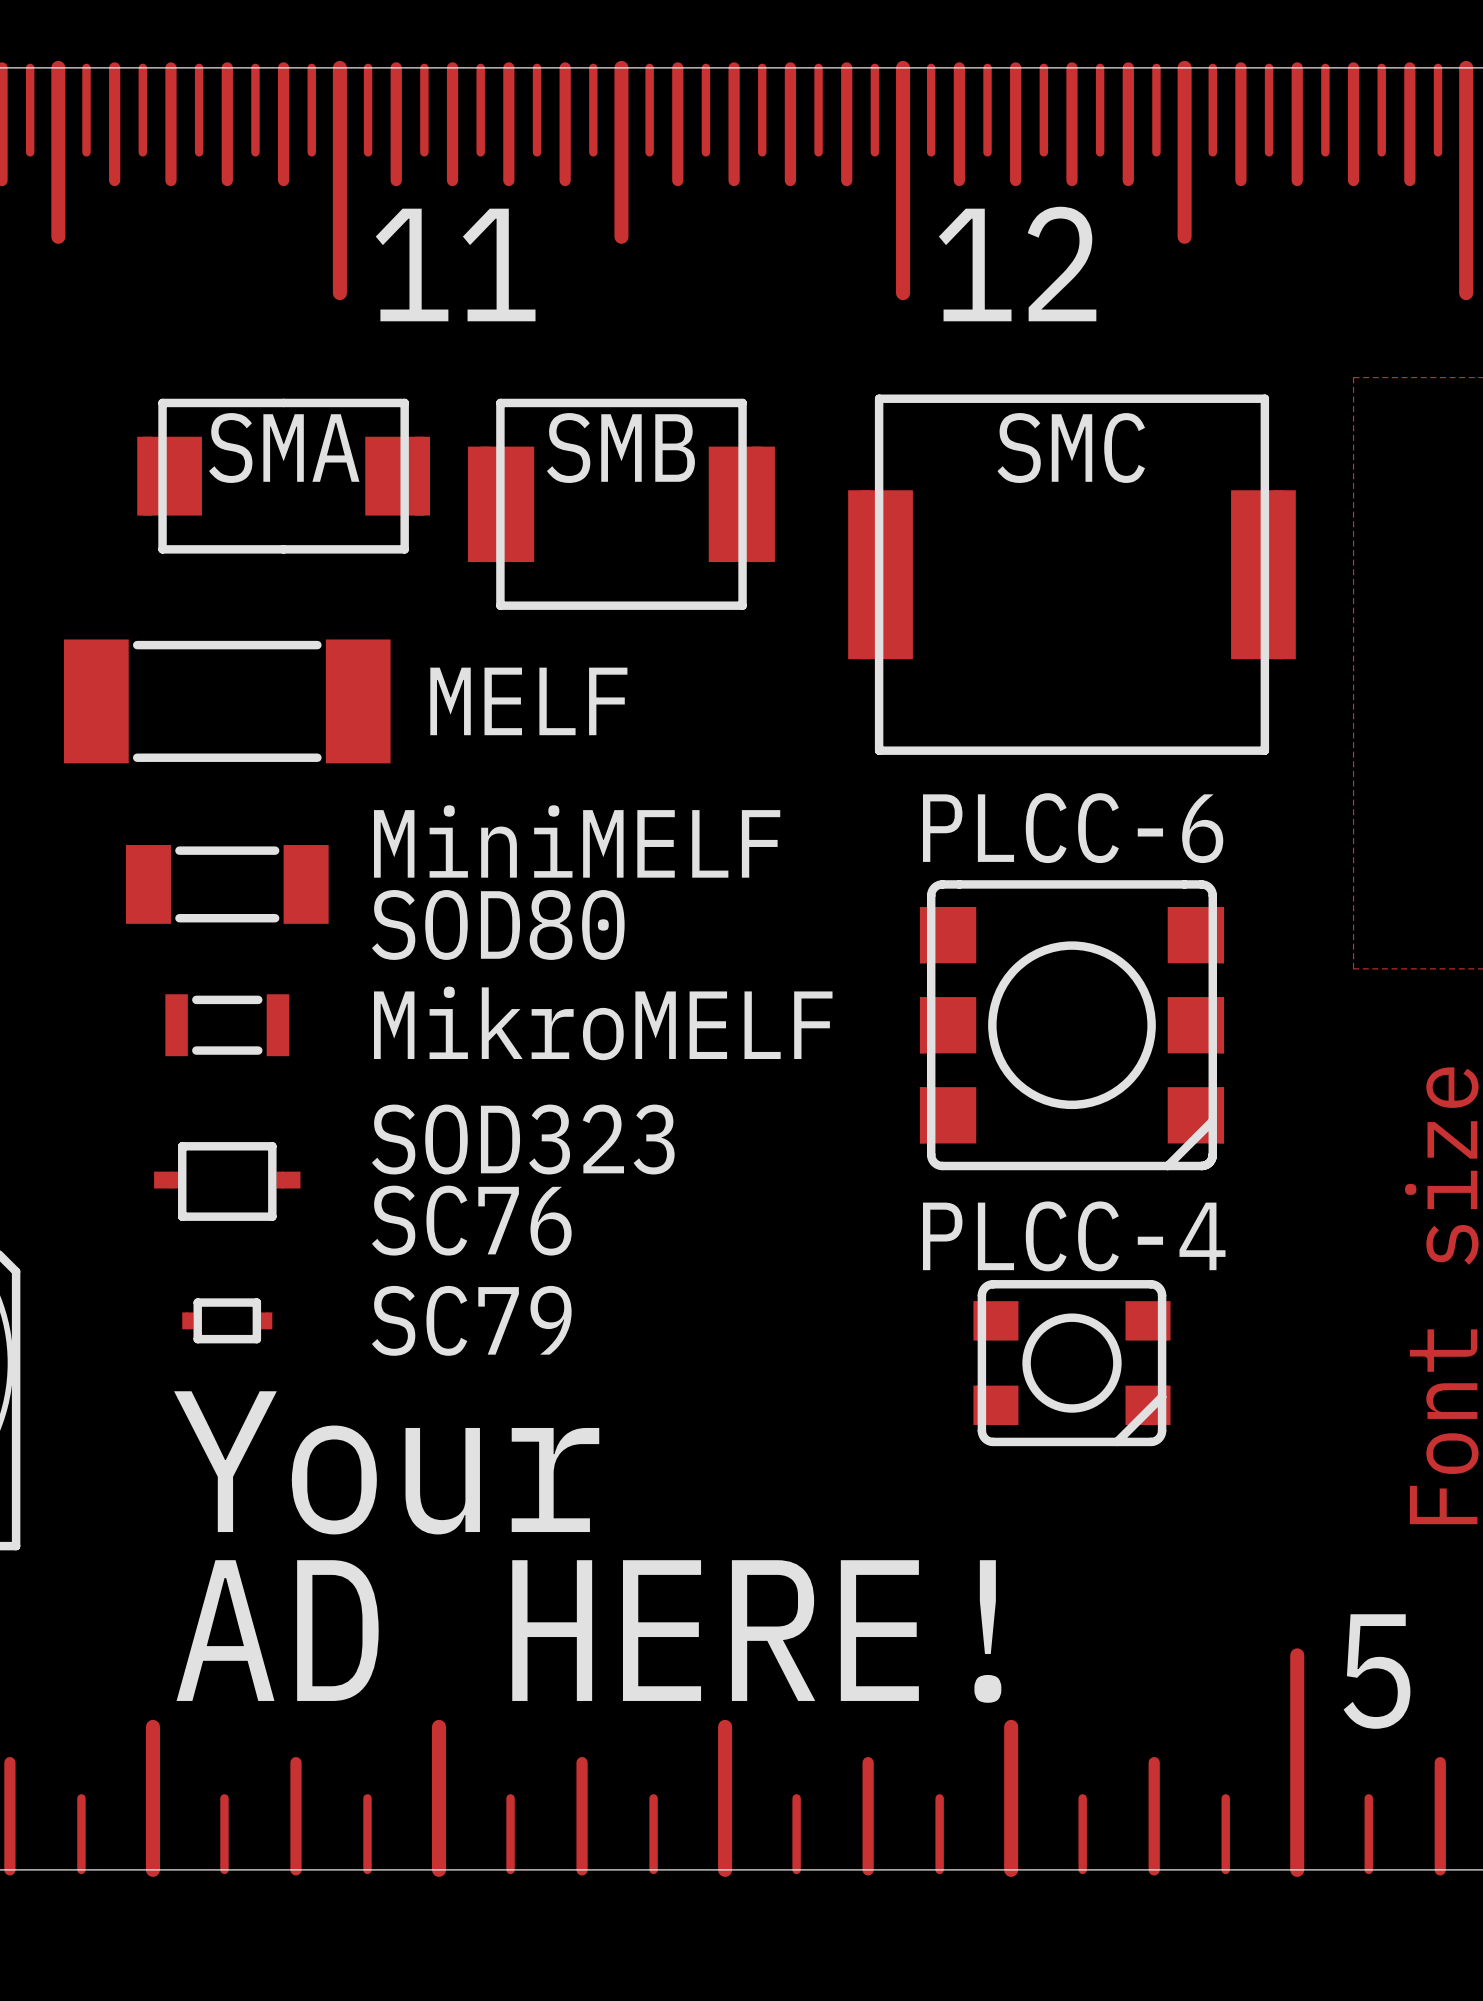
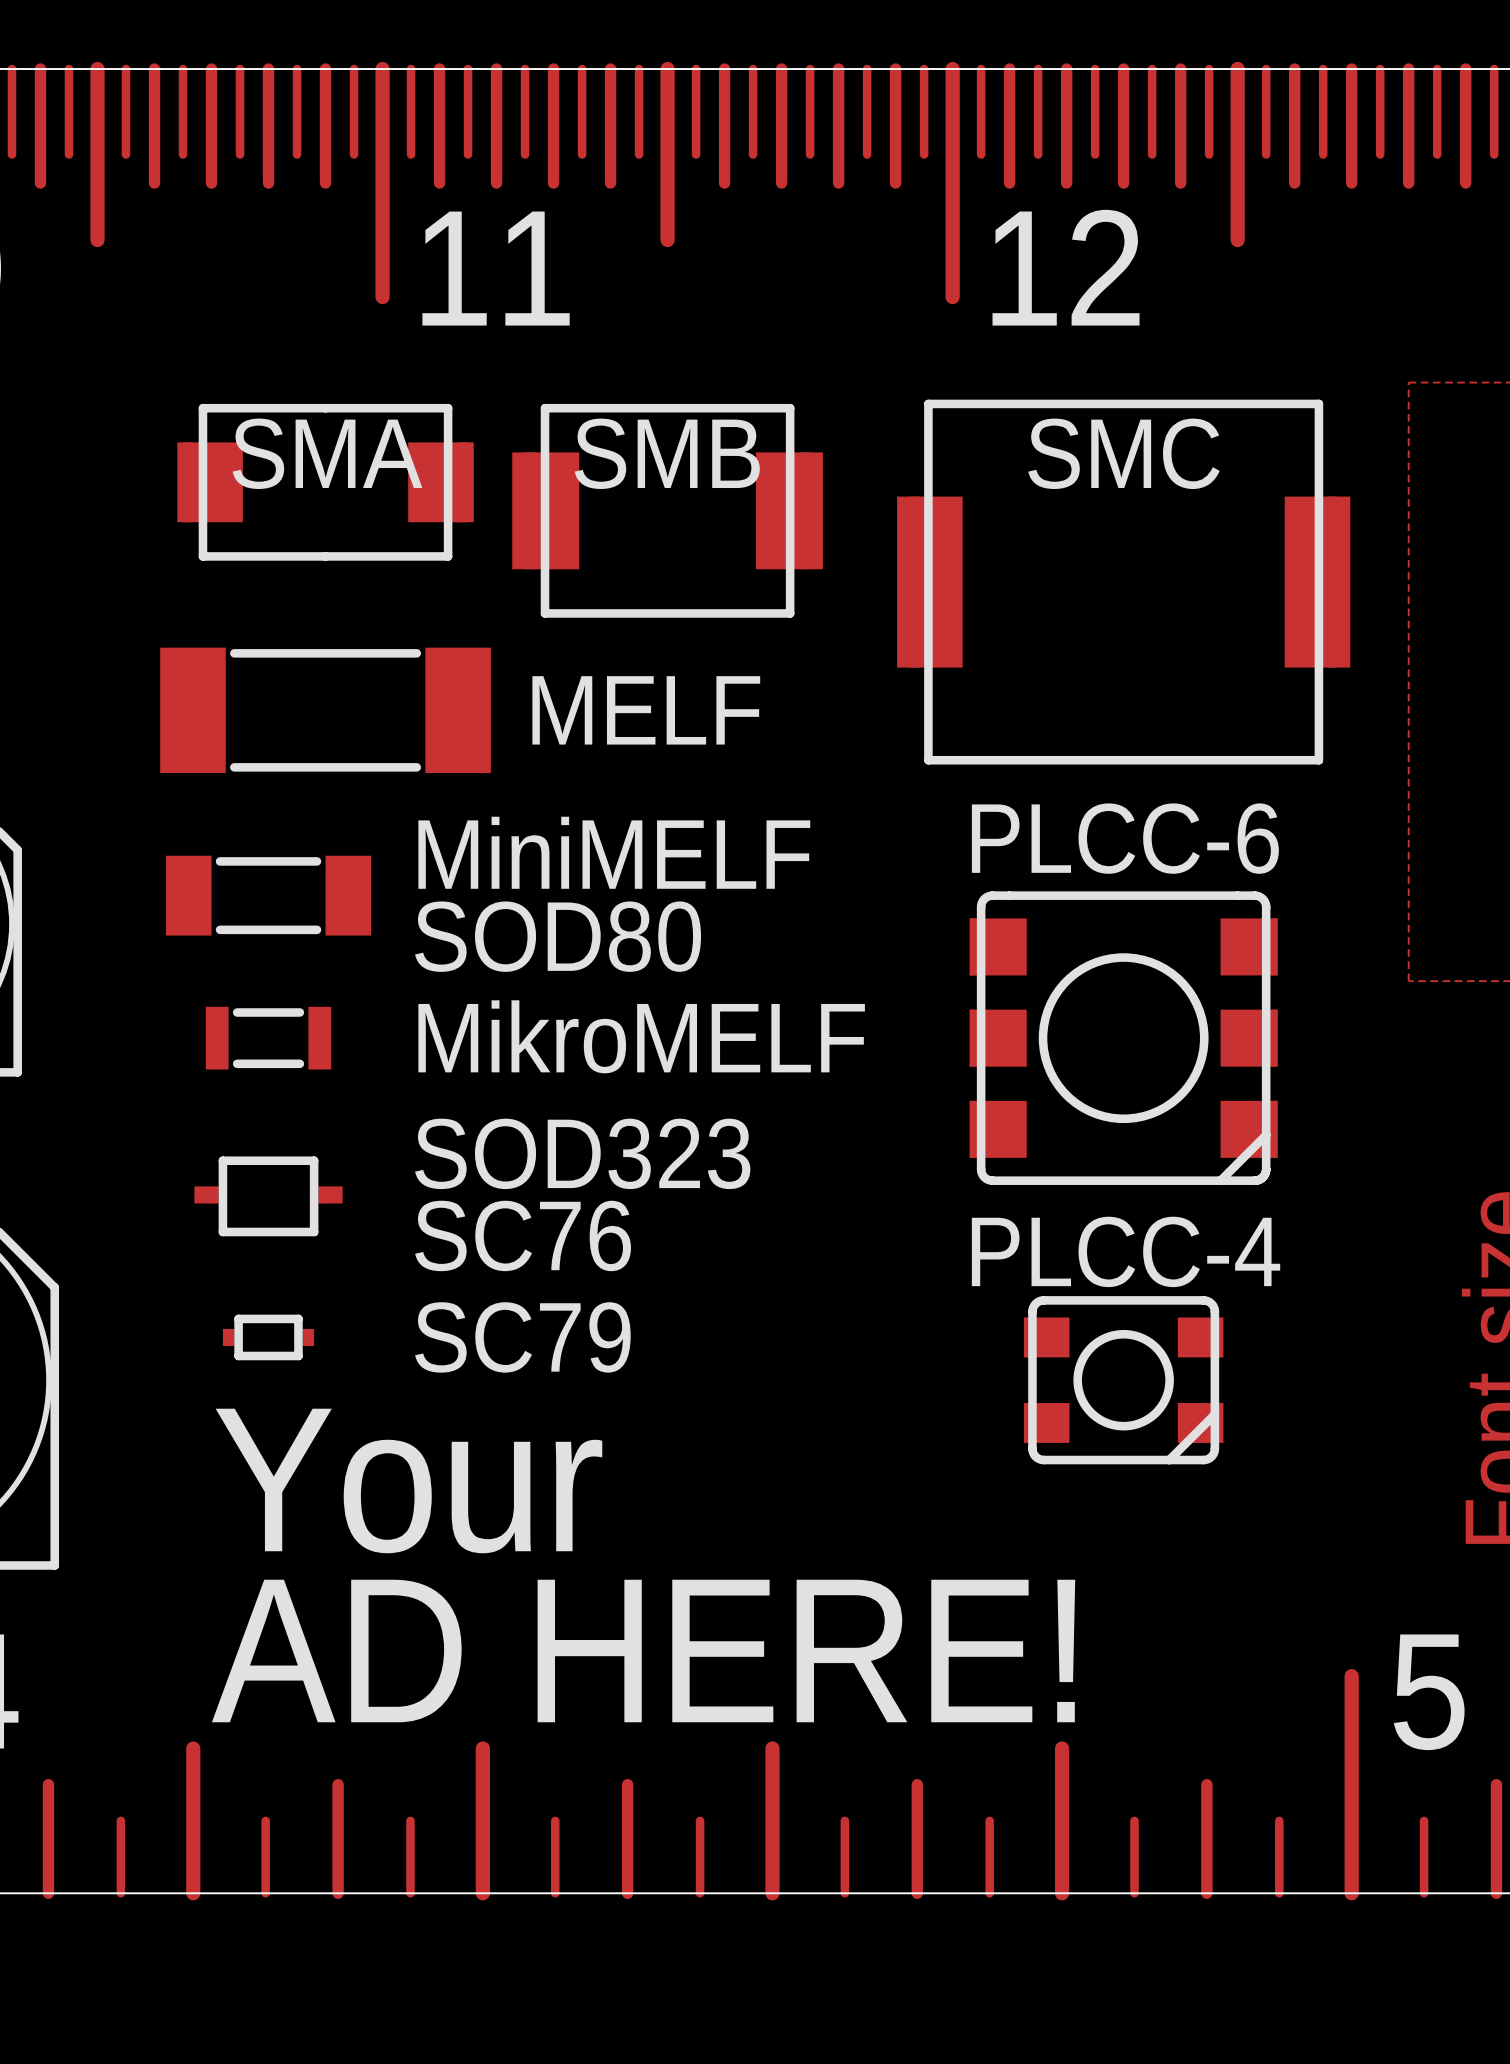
part position: (227, 701) -> (325, 710)
text position: MELF (528, 701) -> MELF (646, 710)

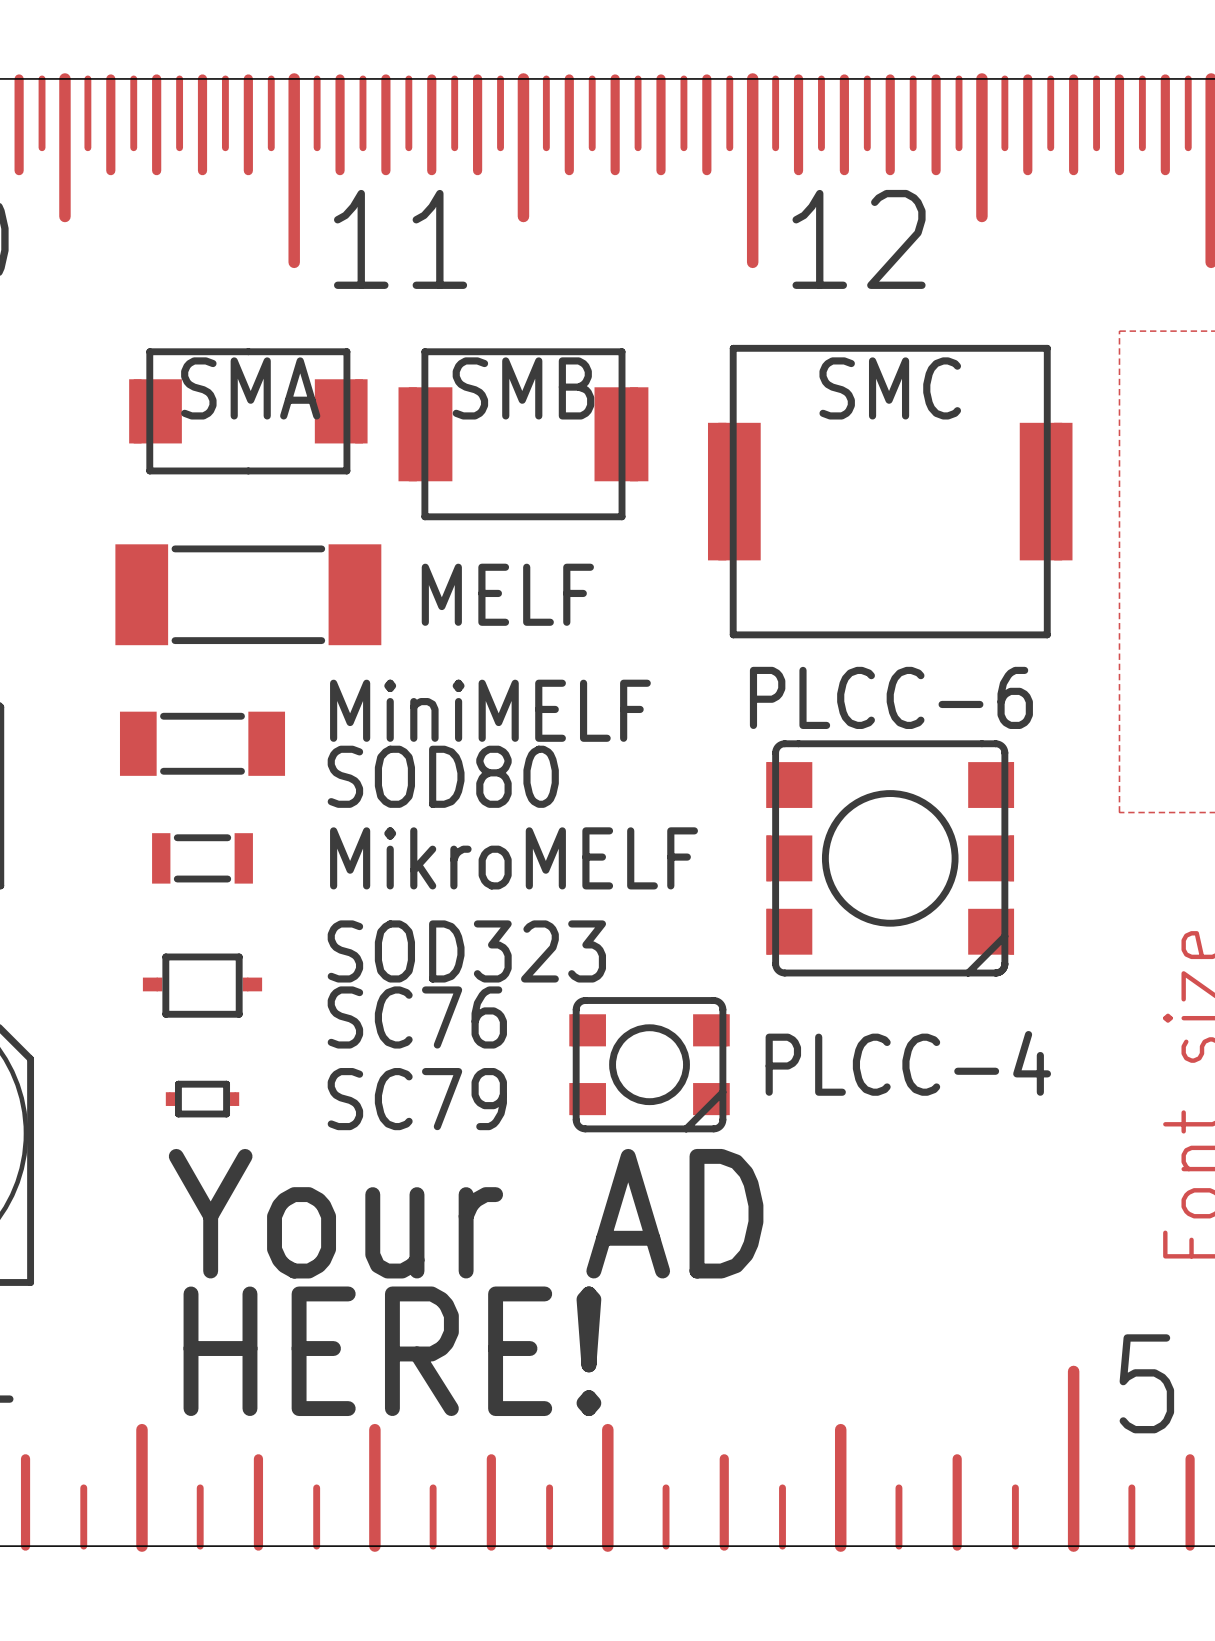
text position: PLCC-4 (1126, 1251) -> PLCC-4 (908, 1063)
part position: (1123, 1380) -> (649, 1064)
text: Your (408, 1481) -> Your AD (466, 1213)
text: AD HERE! (643, 1651) -> HERE! (392, 1351)

